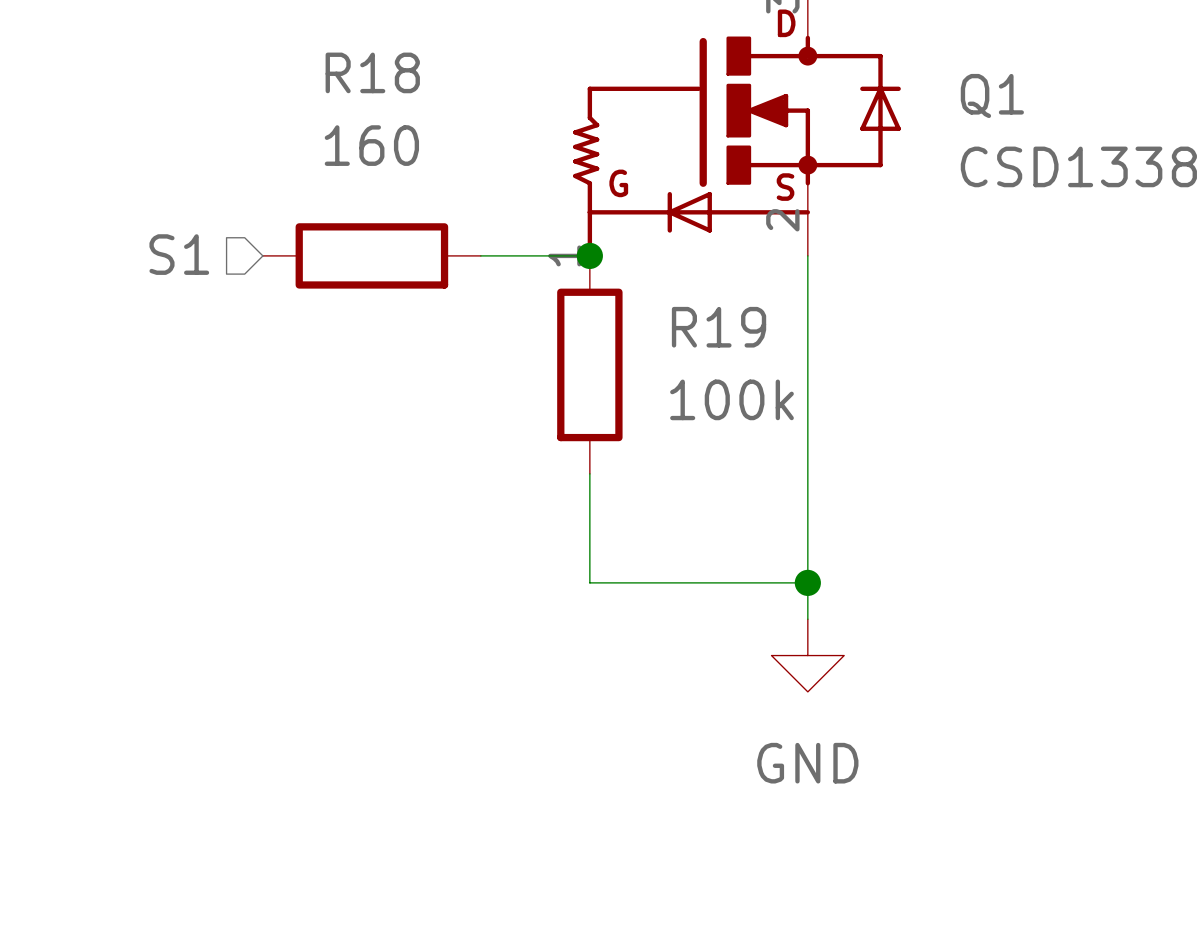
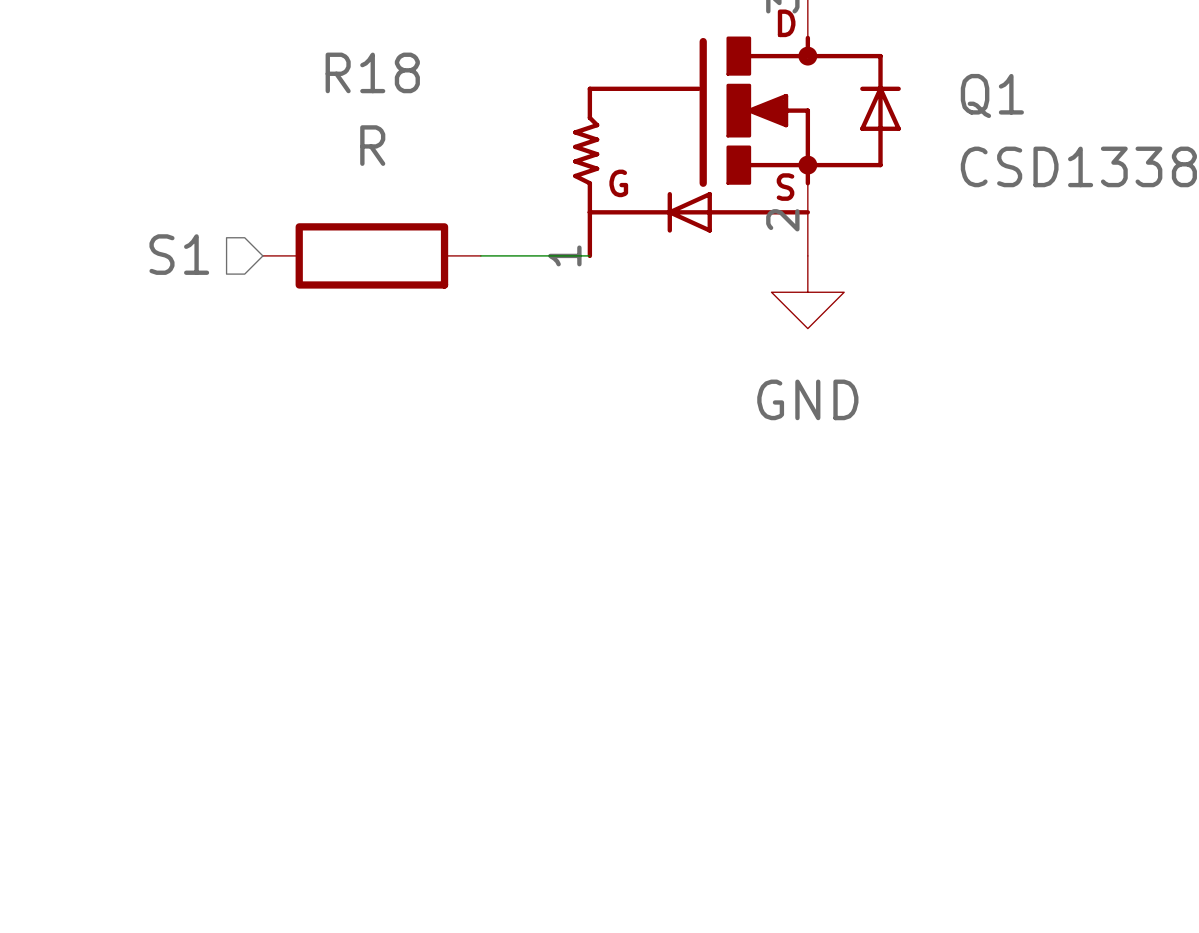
R18 value: 160 (371, 145) -> R (372, 145)
junction: (589, 255) -> none
wire: (807, 255) (807, 619) -> none
R19: 100k (589, 364) -> none
wire: (589, 473) (589, 582) (807, 582) -> none
junction: (807, 582) -> none
power symbol position: GND (807, 655) -> GND (807, 292)

